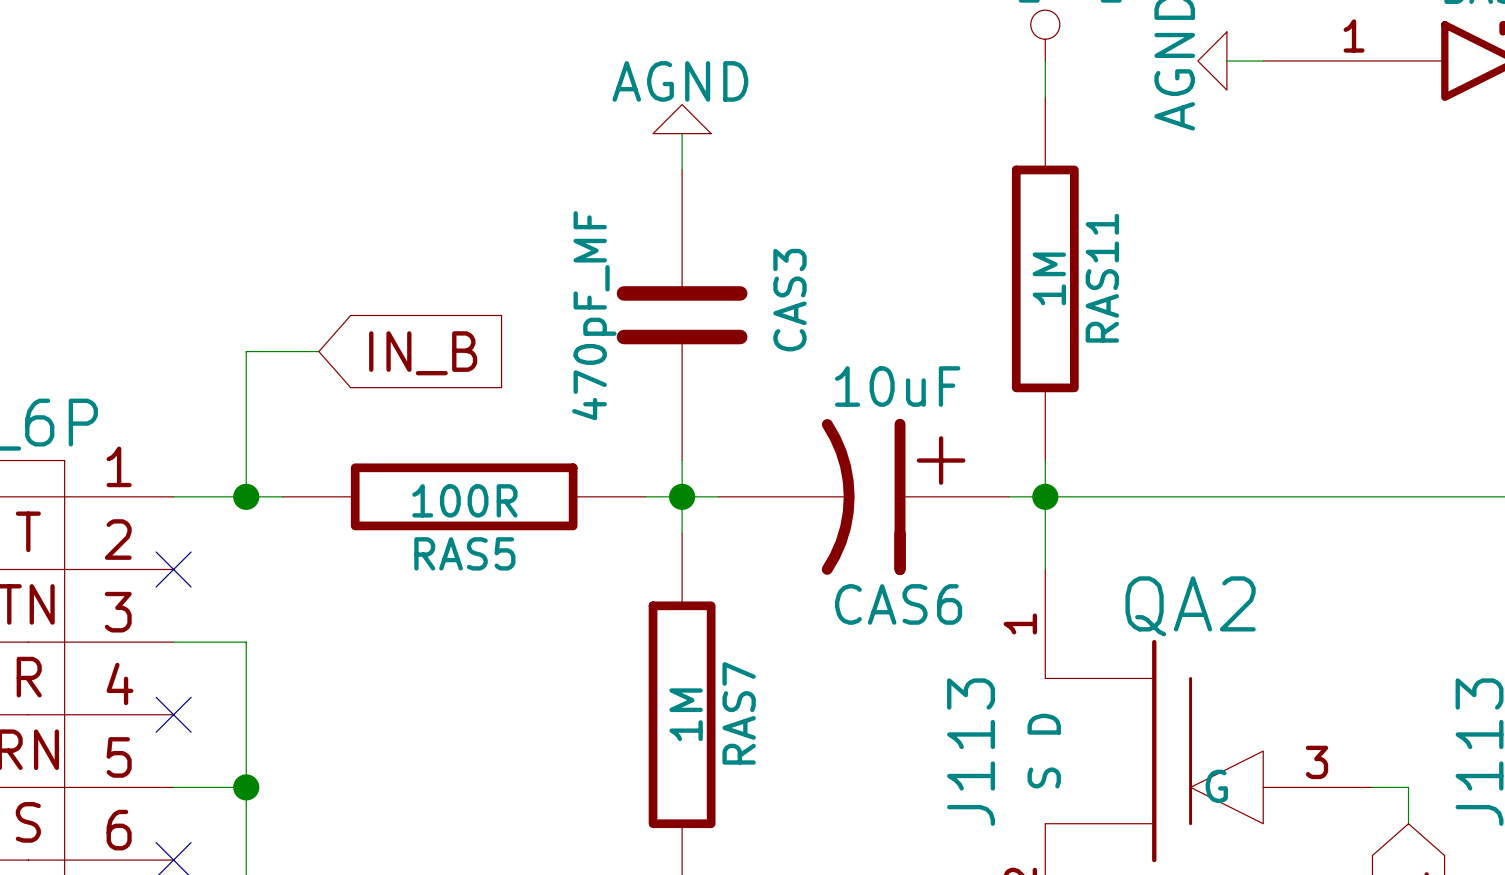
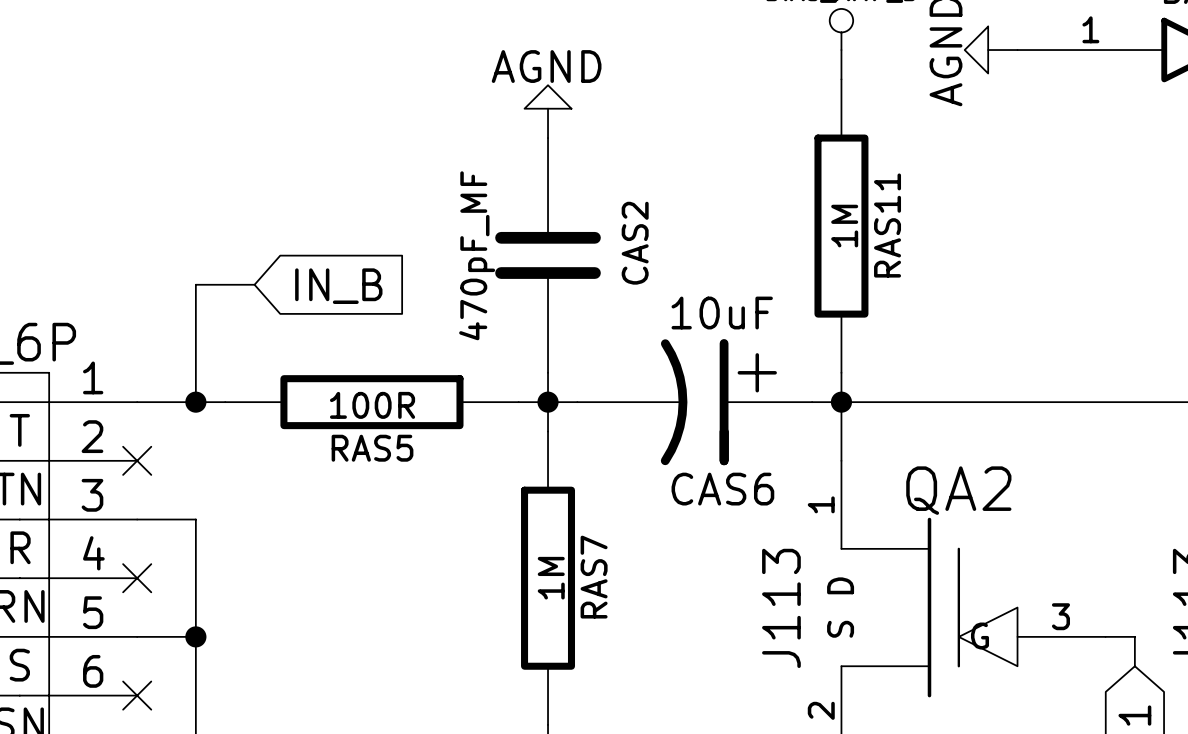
CAS3 name: CAS3 (789, 300) -> CAS2 (635, 243)

